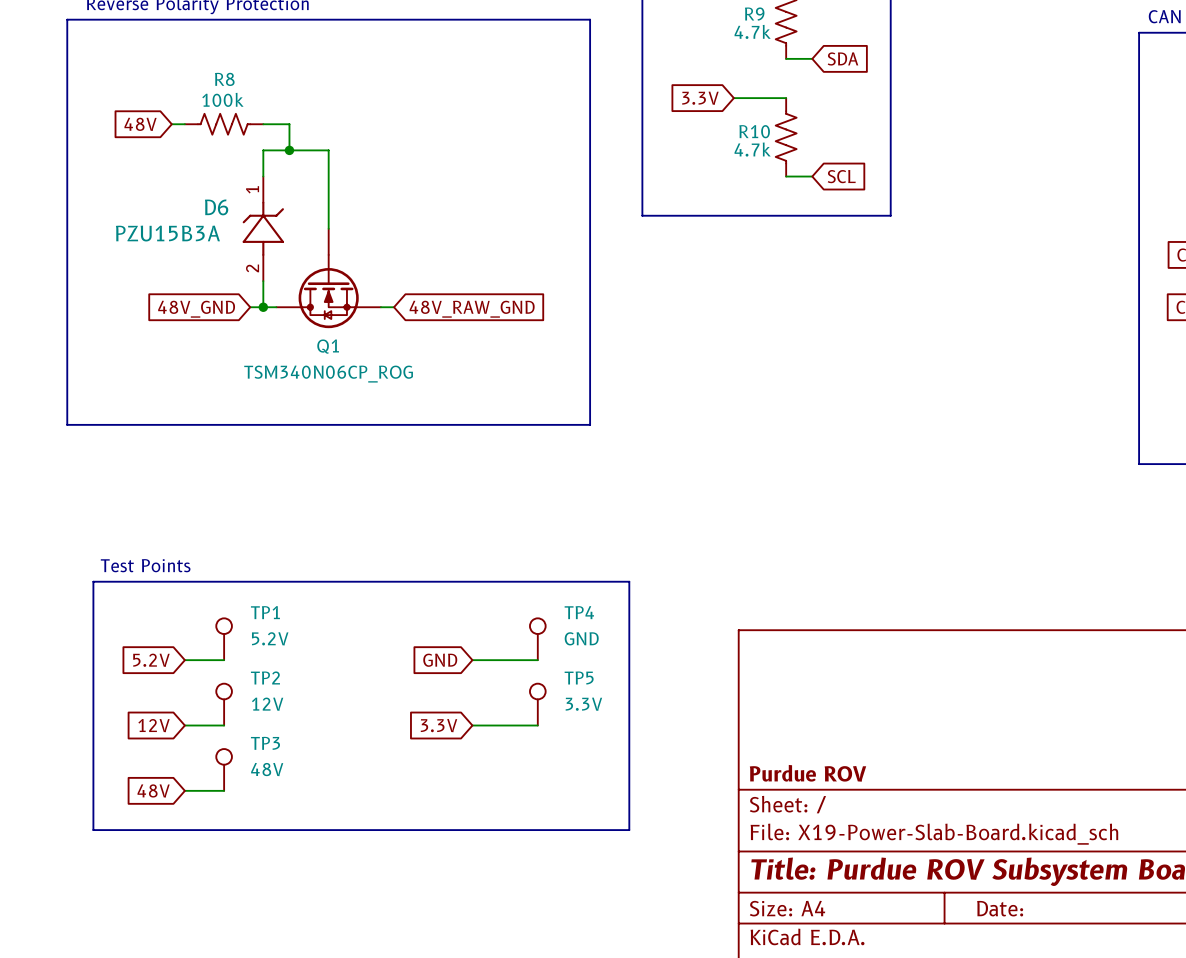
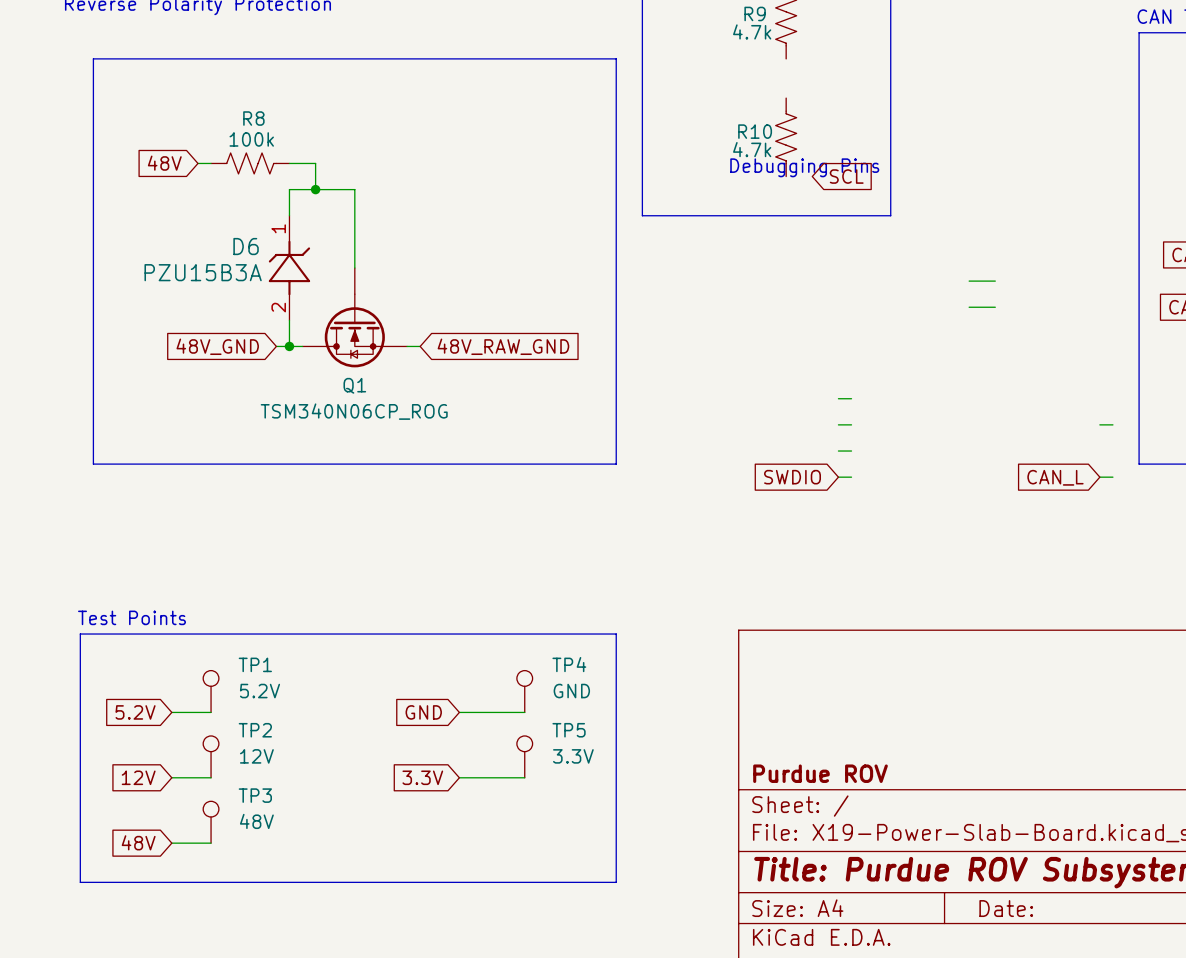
line: (67, 19) (590, 19) (590, 424) (67, 424) (67, 19) -> (93, 58) (616, 58) (616, 464) (93, 464) (93, 58)
wire: (786, 58) (812, 58) -> none
global label: SDA (842, 58) -> none
global label: 3.3V (700, 98) -> none
wire: (733, 98) (786, 98) -> none
global label position: 48V (140, 124) -> 48V (164, 163)
wire: (171, 124) (184, 124) -> (197, 163) (211, 163)
R8 position: (224, 124) -> (250, 163)
wire: (263, 124) (289, 124) (289, 150) -> (289, 163) (315, 163) (315, 189)
junction position: (289, 150) -> (315, 189)
text: none -> Debugging Pins (804, 167)
wire: (263, 176) (263, 150) (328, 150) (328, 228) -> (289, 215) (289, 189) (354, 189) (354, 268)
wire: (786, 176) (812, 176) -> (969, 281) (995, 281)
D6 position: (263, 228) -> (289, 268)
Q1 position: (328, 278) -> (354, 317)
wire: (263, 281) (263, 307) -> (289, 320) (289, 346)
wire: (250, 307) (276, 307) -> (276, 346) (302, 346)
junction position: (263, 307) -> (289, 346)
wire: (380, 307) (394, 307) -> (407, 346) (420, 346)
wire: none -> (969, 307) (995, 307)
global label position: 48V_GND (196, 309) -> 48V_GND (217, 346)
global label position: 48V_RAW_GND (472, 309) -> 48V_RAW_GND (503, 346)
wire: none -> (838, 398) (851, 398)
wire: none -> (838, 424) (851, 424)
wire: none -> (1099, 424) (1112, 424)
wire: none -> (838, 451) (851, 451)
global label: none -> SWDIO (792, 477)
wire: none -> (838, 477) (851, 477)
wire: none -> (1099, 477) (1112, 477)
global label: none -> CAN_L (1055, 477)
text position: Test Points (145, 565) -> Test Points (131, 617)
line: (93, 581) (629, 581) (629, 830) (93, 830) (93, 581) -> (80, 634) (616, 634) (616, 882) (80, 882) (80, 634)
TP1 position: (224, 639) -> (211, 691)
TP4 position: (537, 639) -> (524, 691)
global label position: 5.2V (151, 660) -> 5.2V (135, 712)
wire: (184, 660) (224, 660) -> (171, 712) (211, 712)
global label position: GND (440, 660) -> GND (423, 712)
wire: (472, 660) (537, 660) -> (459, 712) (524, 712)
TP2 position: (224, 704) -> (211, 756)
TP5 position: (537, 704) -> (524, 756)
global label position: 12V (154, 725) -> 12V (138, 777)
wire: (184, 725) (224, 725) -> (171, 777) (211, 777)
global label position: 3.3V (439, 725) -> 3.3V (422, 777)
wire: (472, 725) (537, 725) -> (459, 777) (524, 777)
TP3 position: (224, 769) -> (211, 822)
global label position: 48V (153, 790) -> 48V (138, 842)
wire: (184, 790) (224, 790) -> (171, 843) (211, 843)

